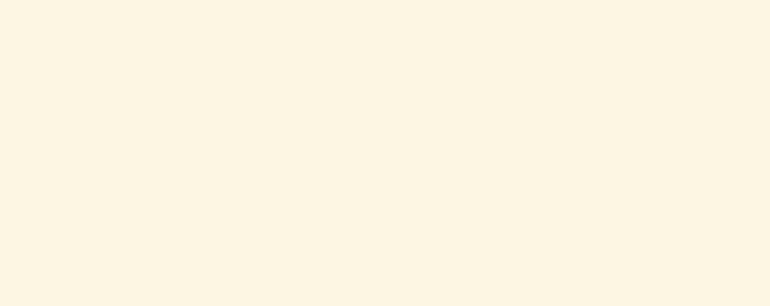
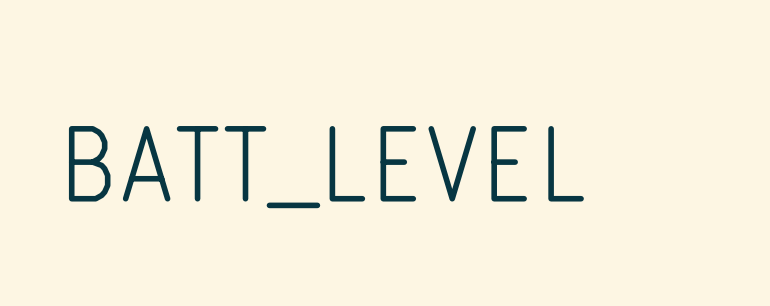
label: none -> BATT_LEVEL (326, 167)

